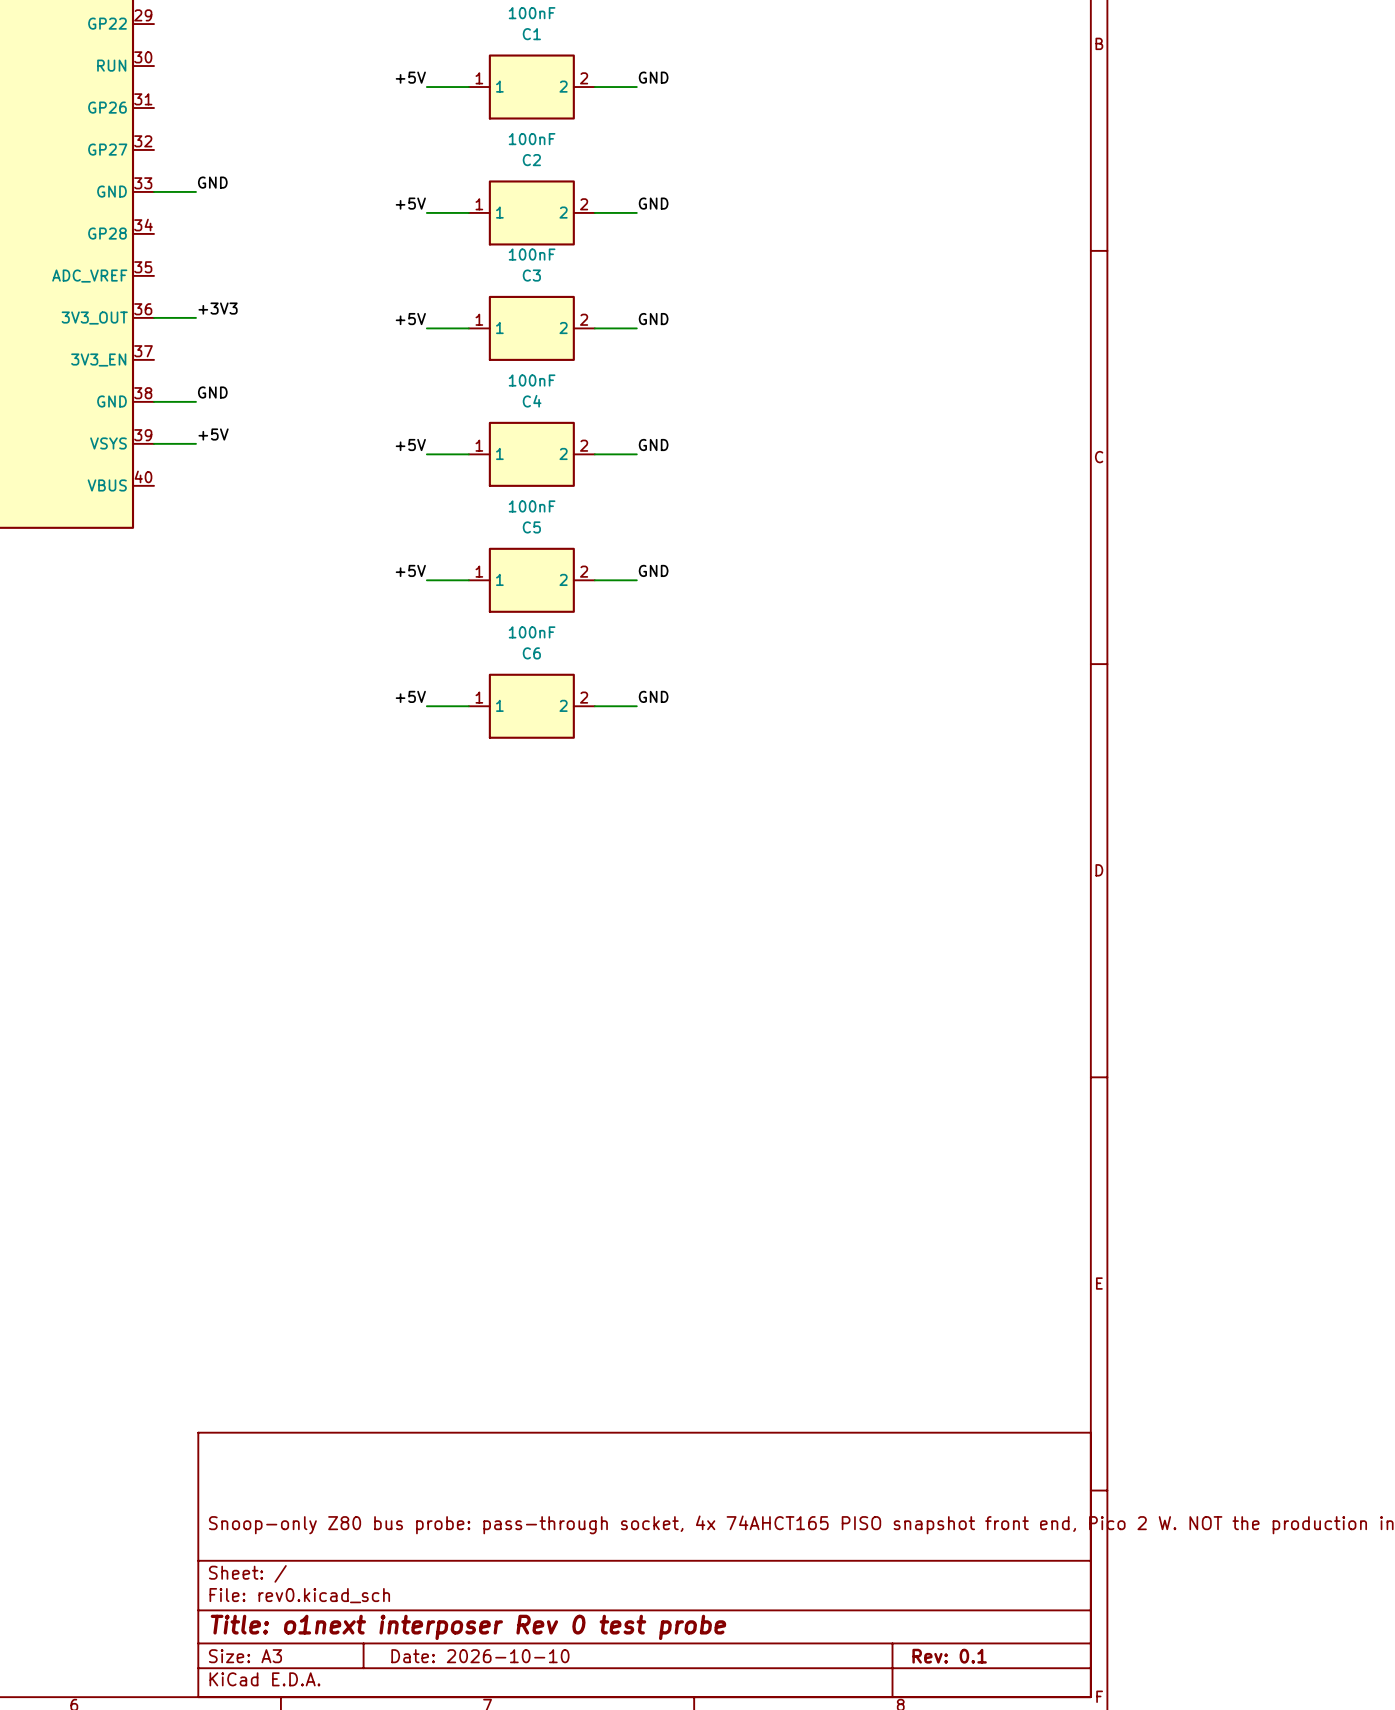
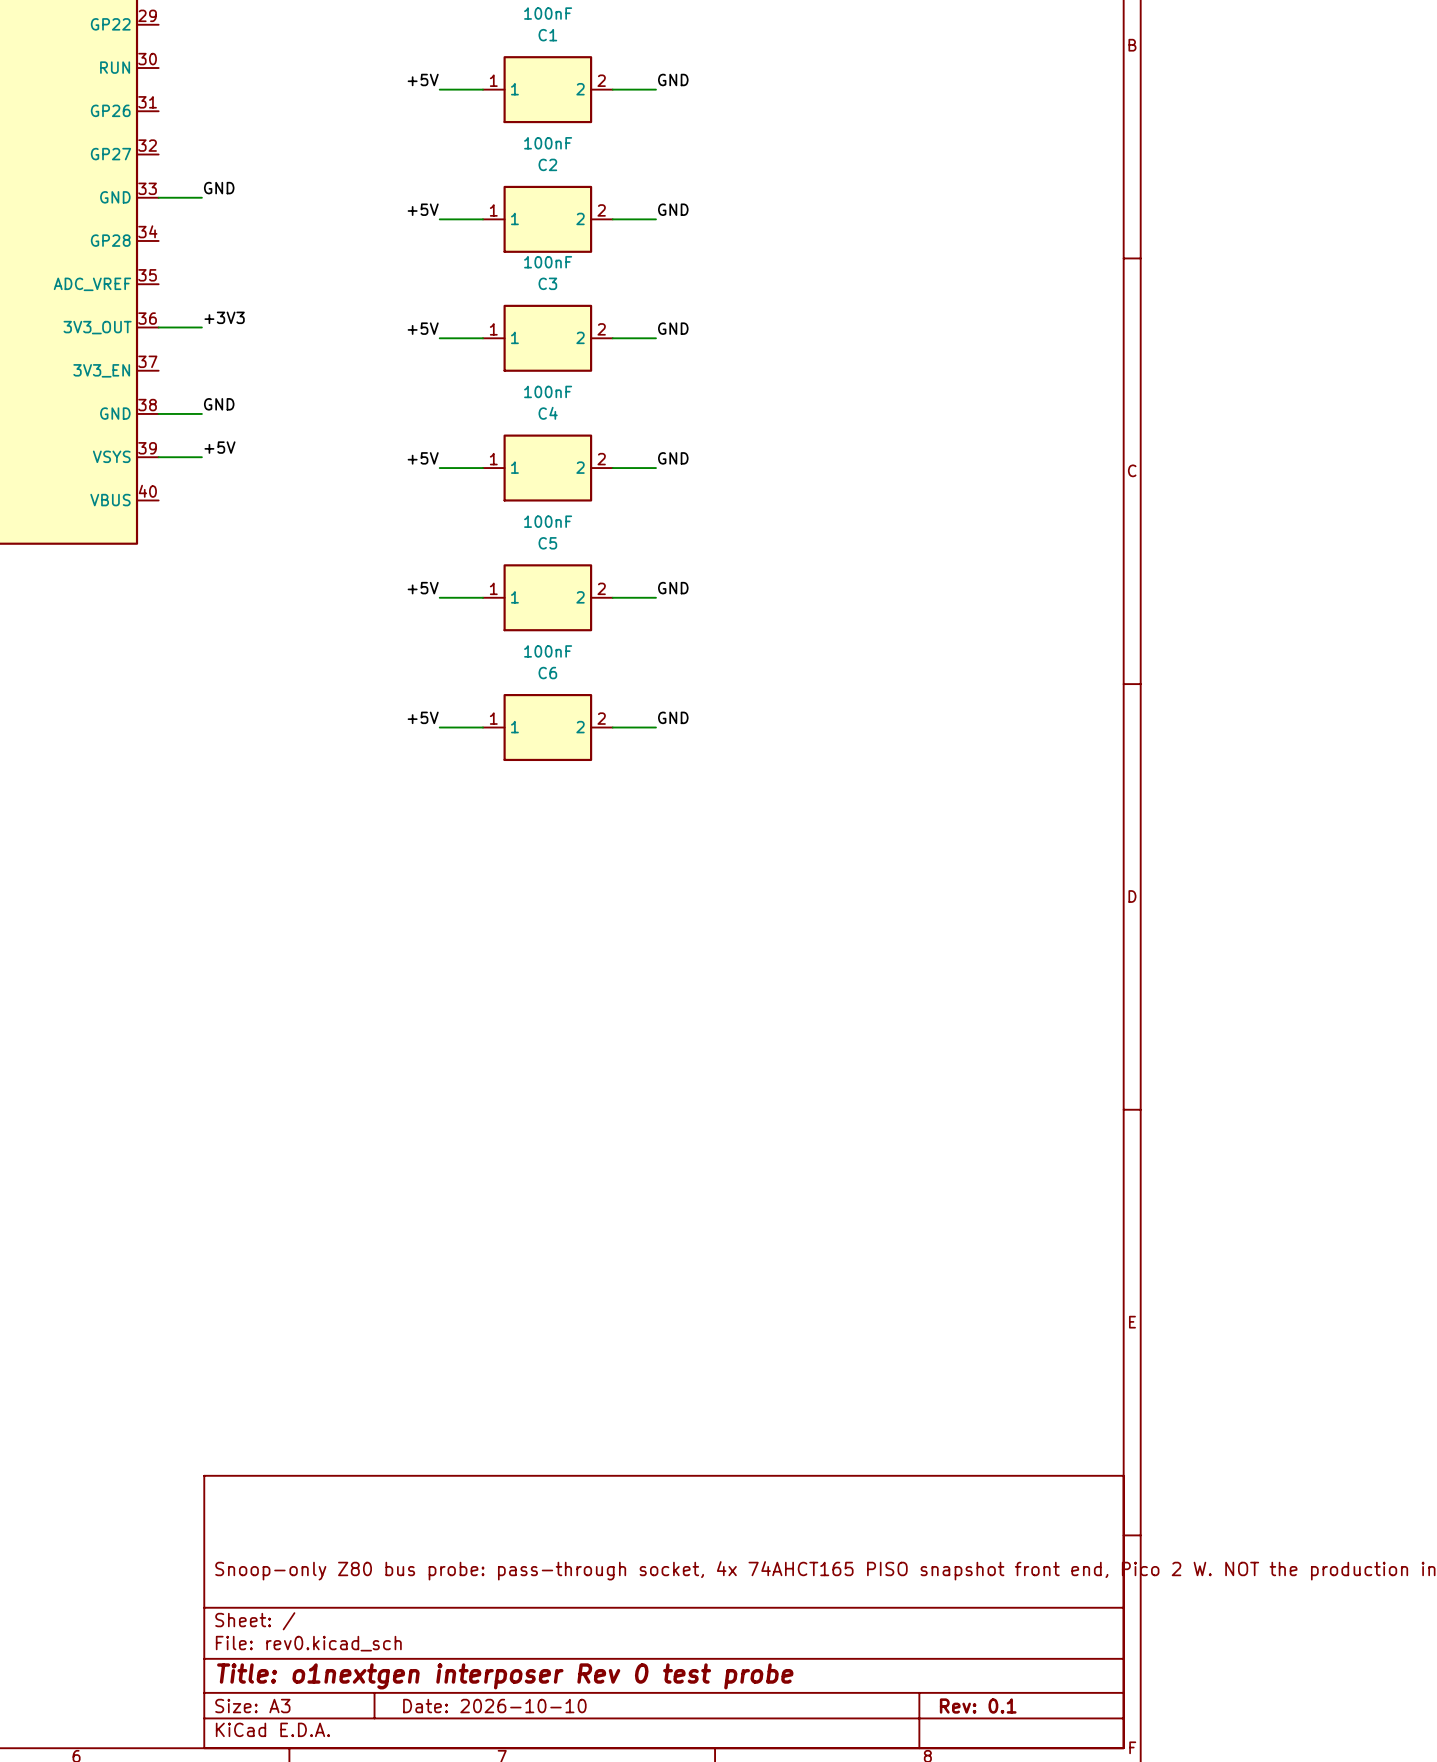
title block: Title: o1next interposer Rev 0 test probe (468, 1627) -> Title: o1nextgen interposer Rev 0 test probe (505, 1676)

